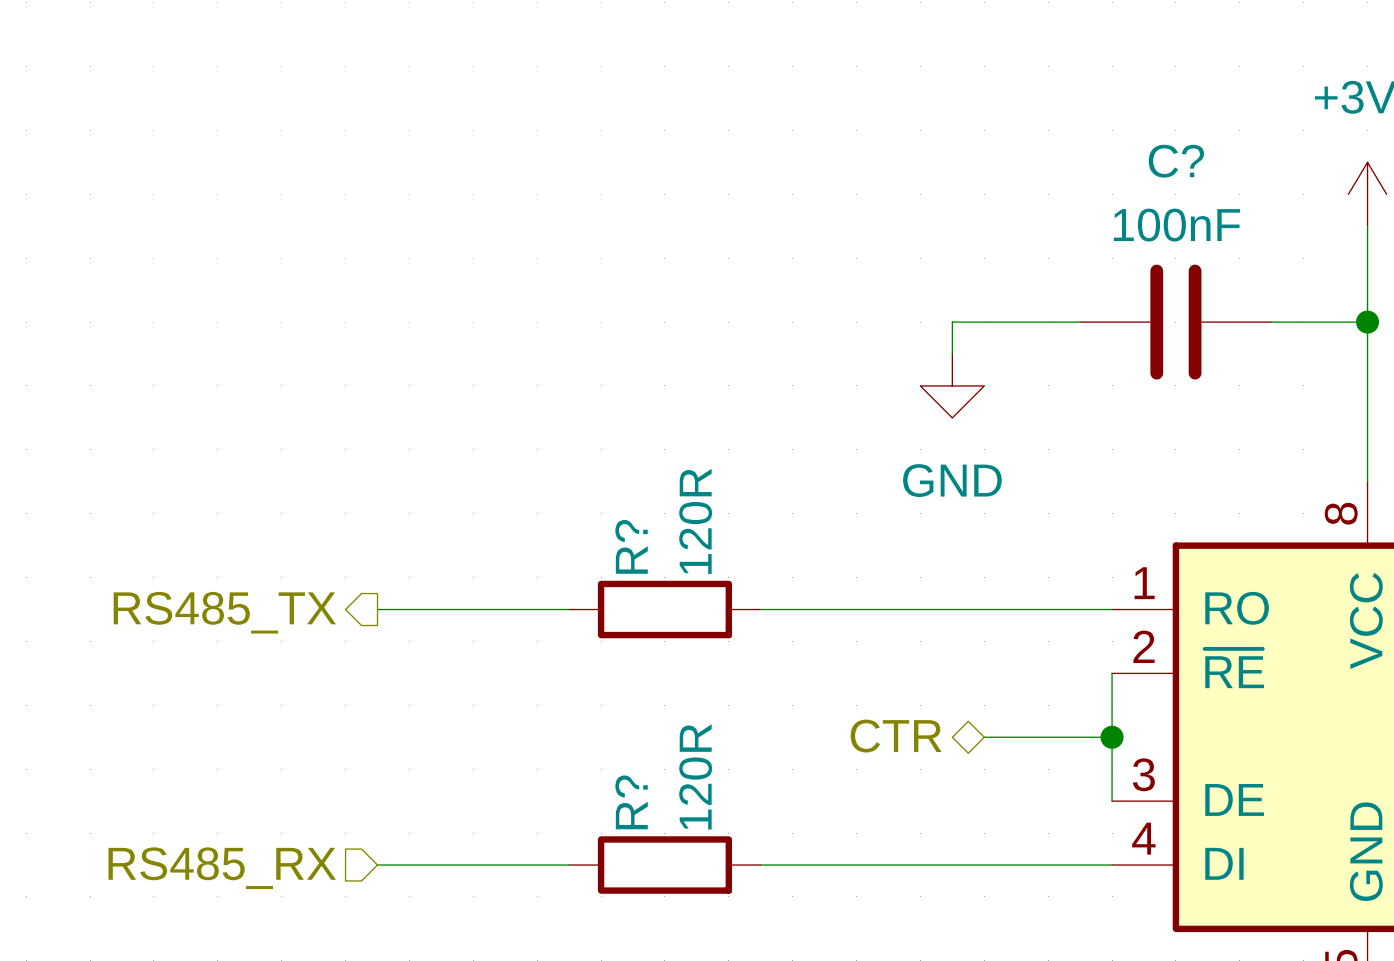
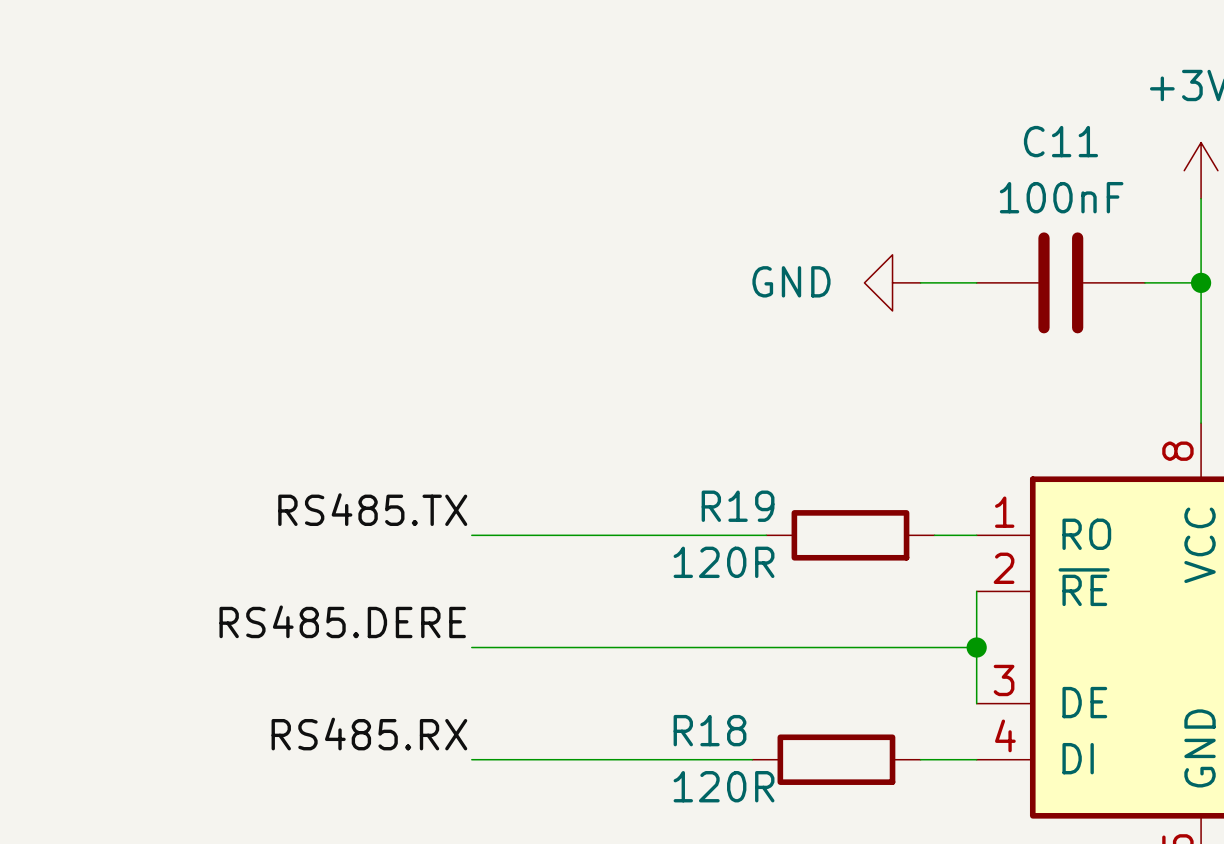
wire: (1048, 322) (952, 322) (952, 354) -> none
C?: 100nF (1175, 322) -> none
C11: none -> 100nF (1060, 282)
power symbol rotation: 0° (952, 385) -> 90° clockwise (892, 282)
power symbol position: GND (952, 385) -> GND (892, 282)
label: none -> RS485.TX (372, 509)
wire: (377, 609) (537, 609) -> none
R?: 120R (664, 609) -> none
wire: (872, 609) (1064, 609) -> (499, 535) (668, 535)
R19: none -> 120R (850, 535)
hierarchical label: RS485_TX (224, 612) -> none
label: none -> RS485.DERE (342, 621)
hierarchical label: CTR (896, 736) -> none
wire: none -> (471, 647) (864, 647)
label: none -> RS485.RX (369, 734)
wire: (377, 865) (537, 865) -> none
R?: 120R (664, 865) -> none
wire: (856, 865) (1048, 865) -> (499, 759) (668, 759)
R18: none -> 120R (836, 759)
hierarchical label: RS485_RX (222, 868) -> none

